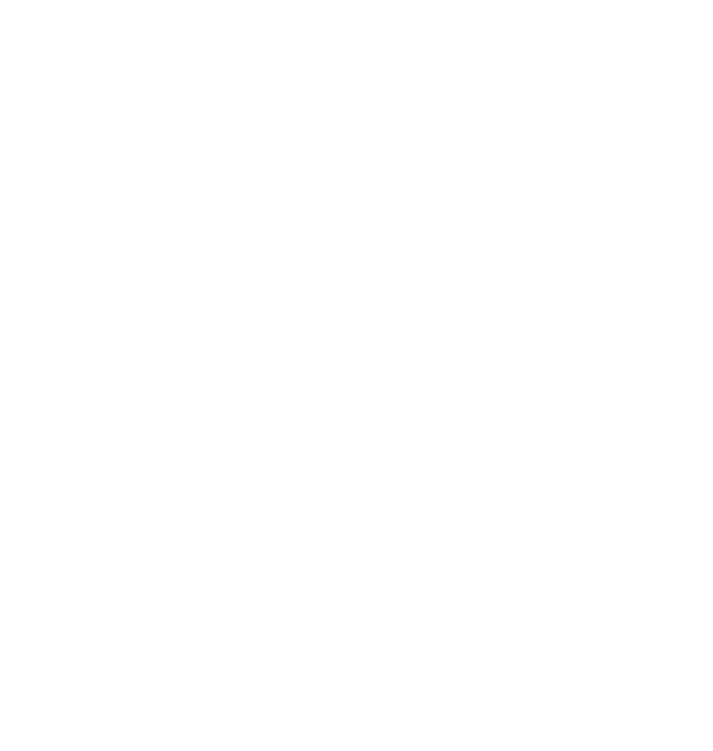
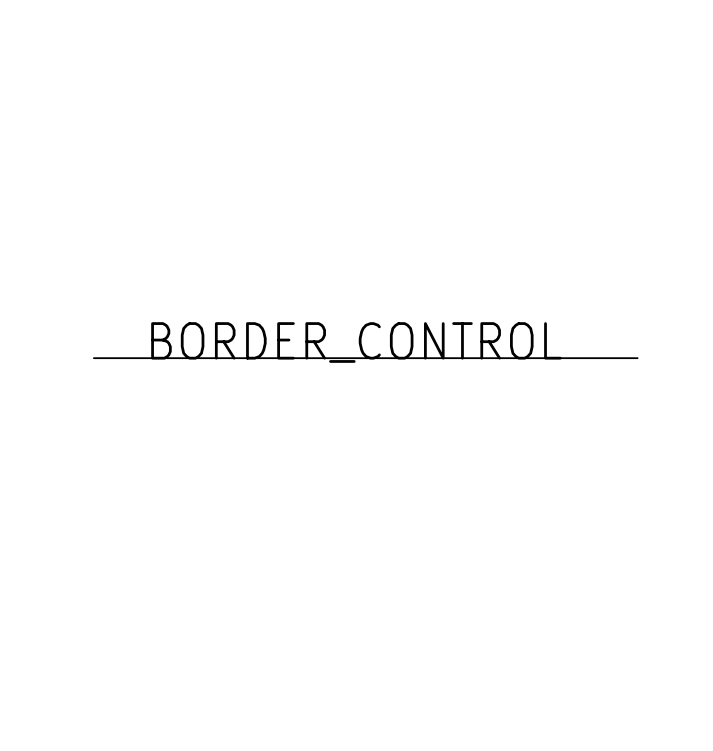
label: none -> BORDER_CONTROL (356, 342)
wire: none -> (93, 358) (637, 358)

